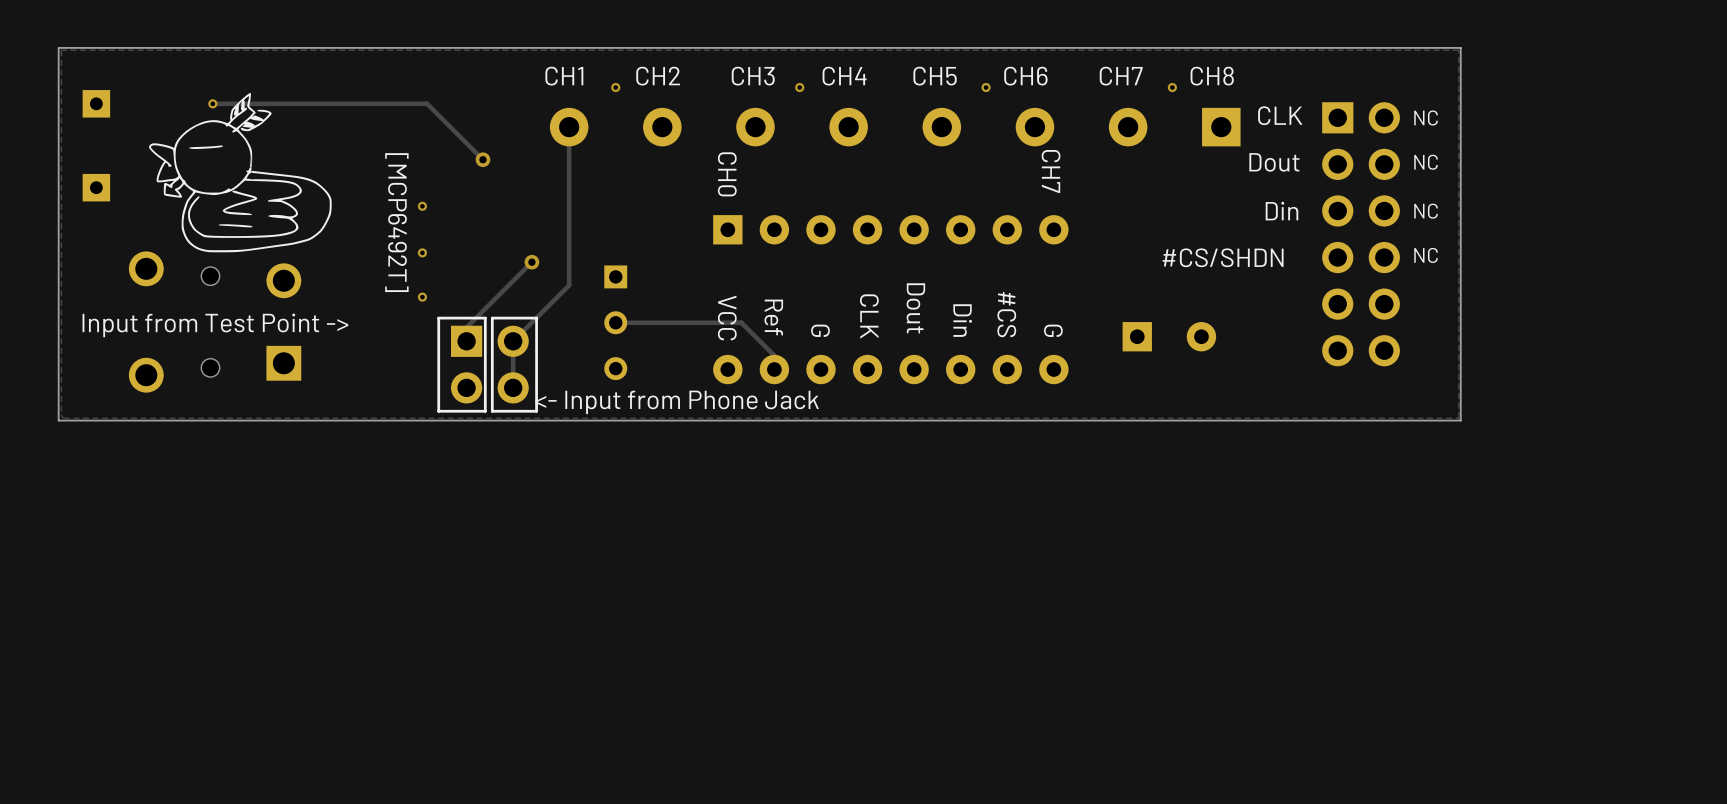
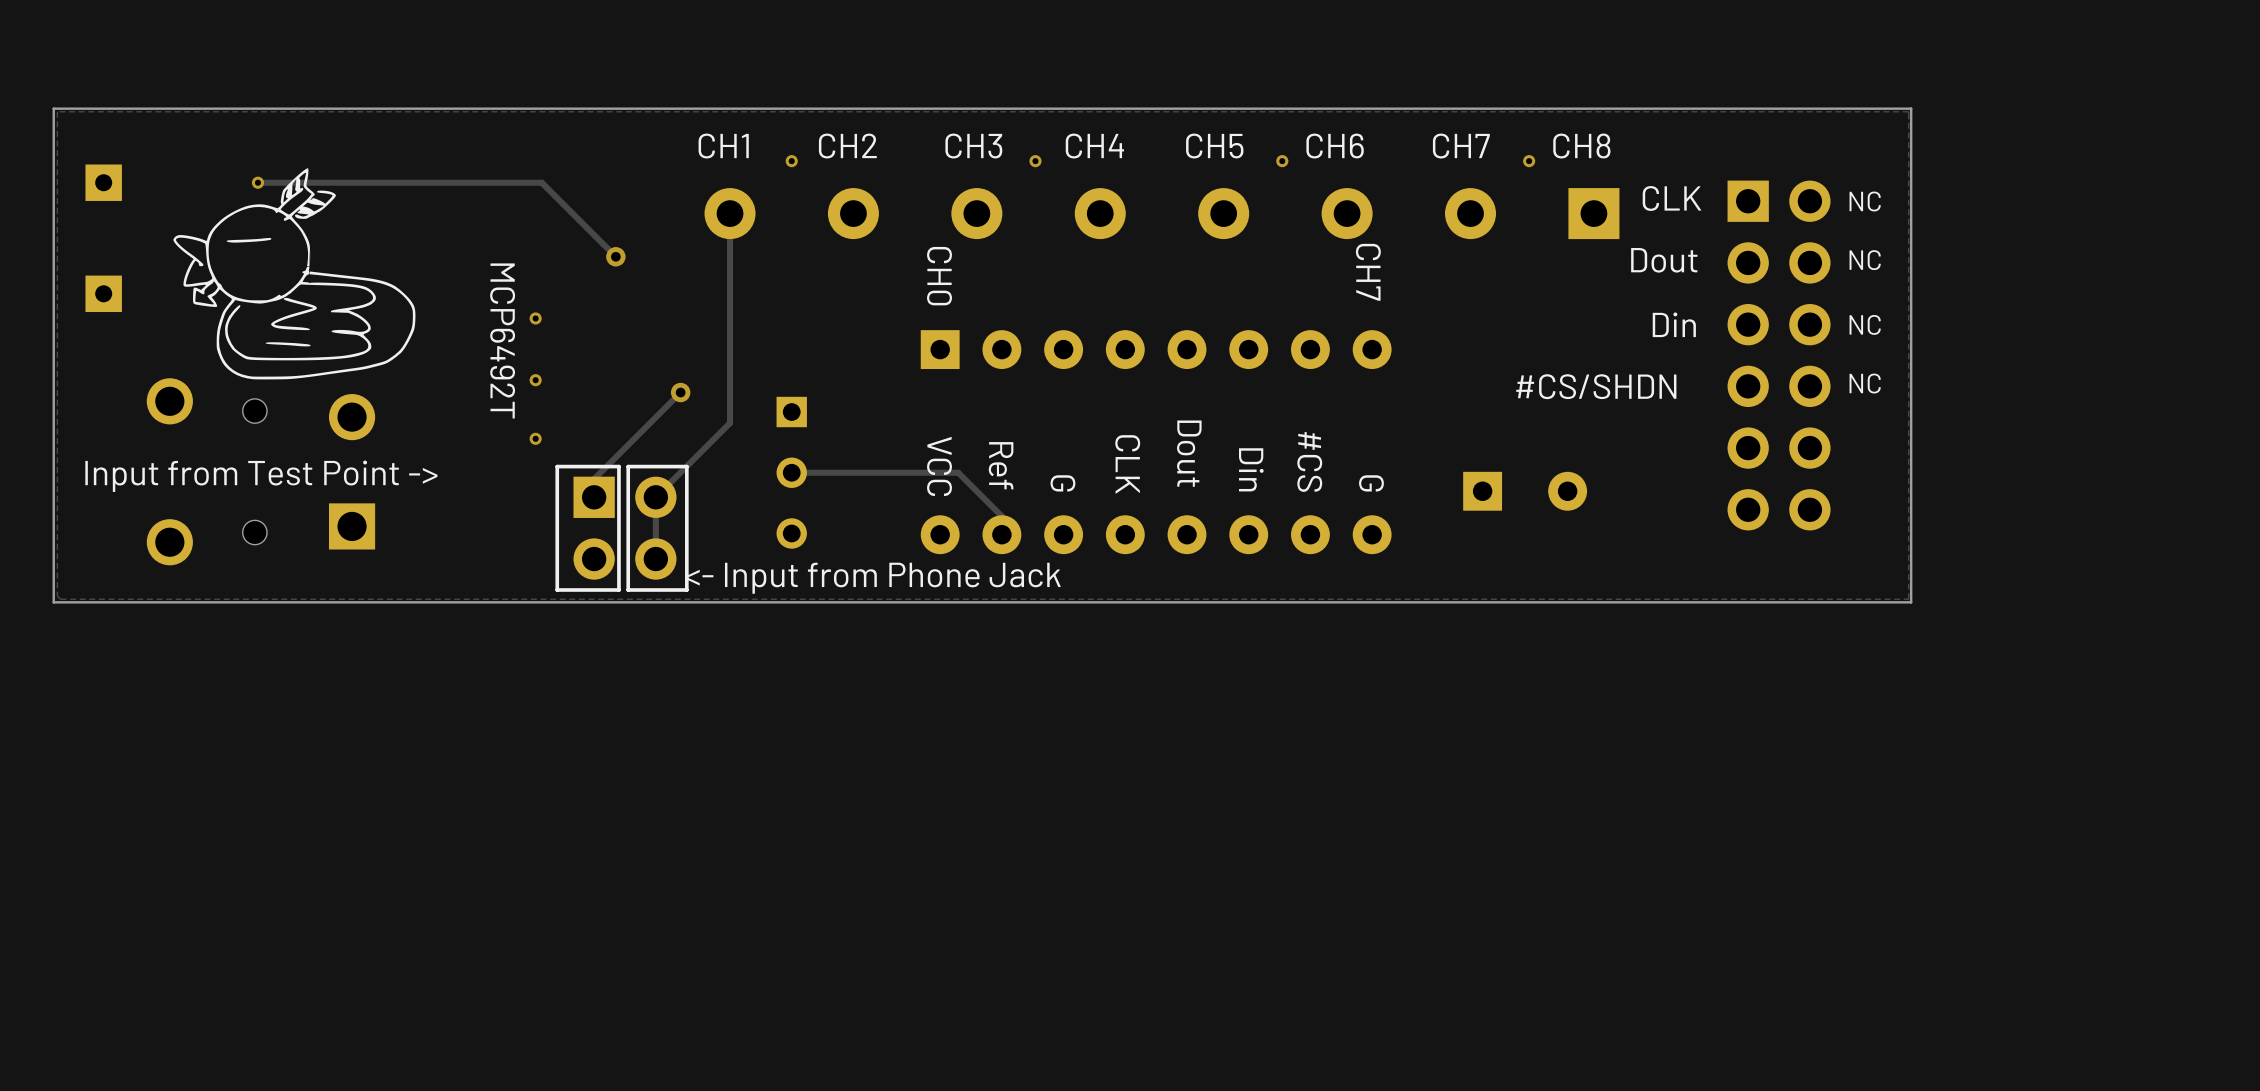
part value: [MCP6492T] (396, 222) -> MCP6492T (502, 340)

